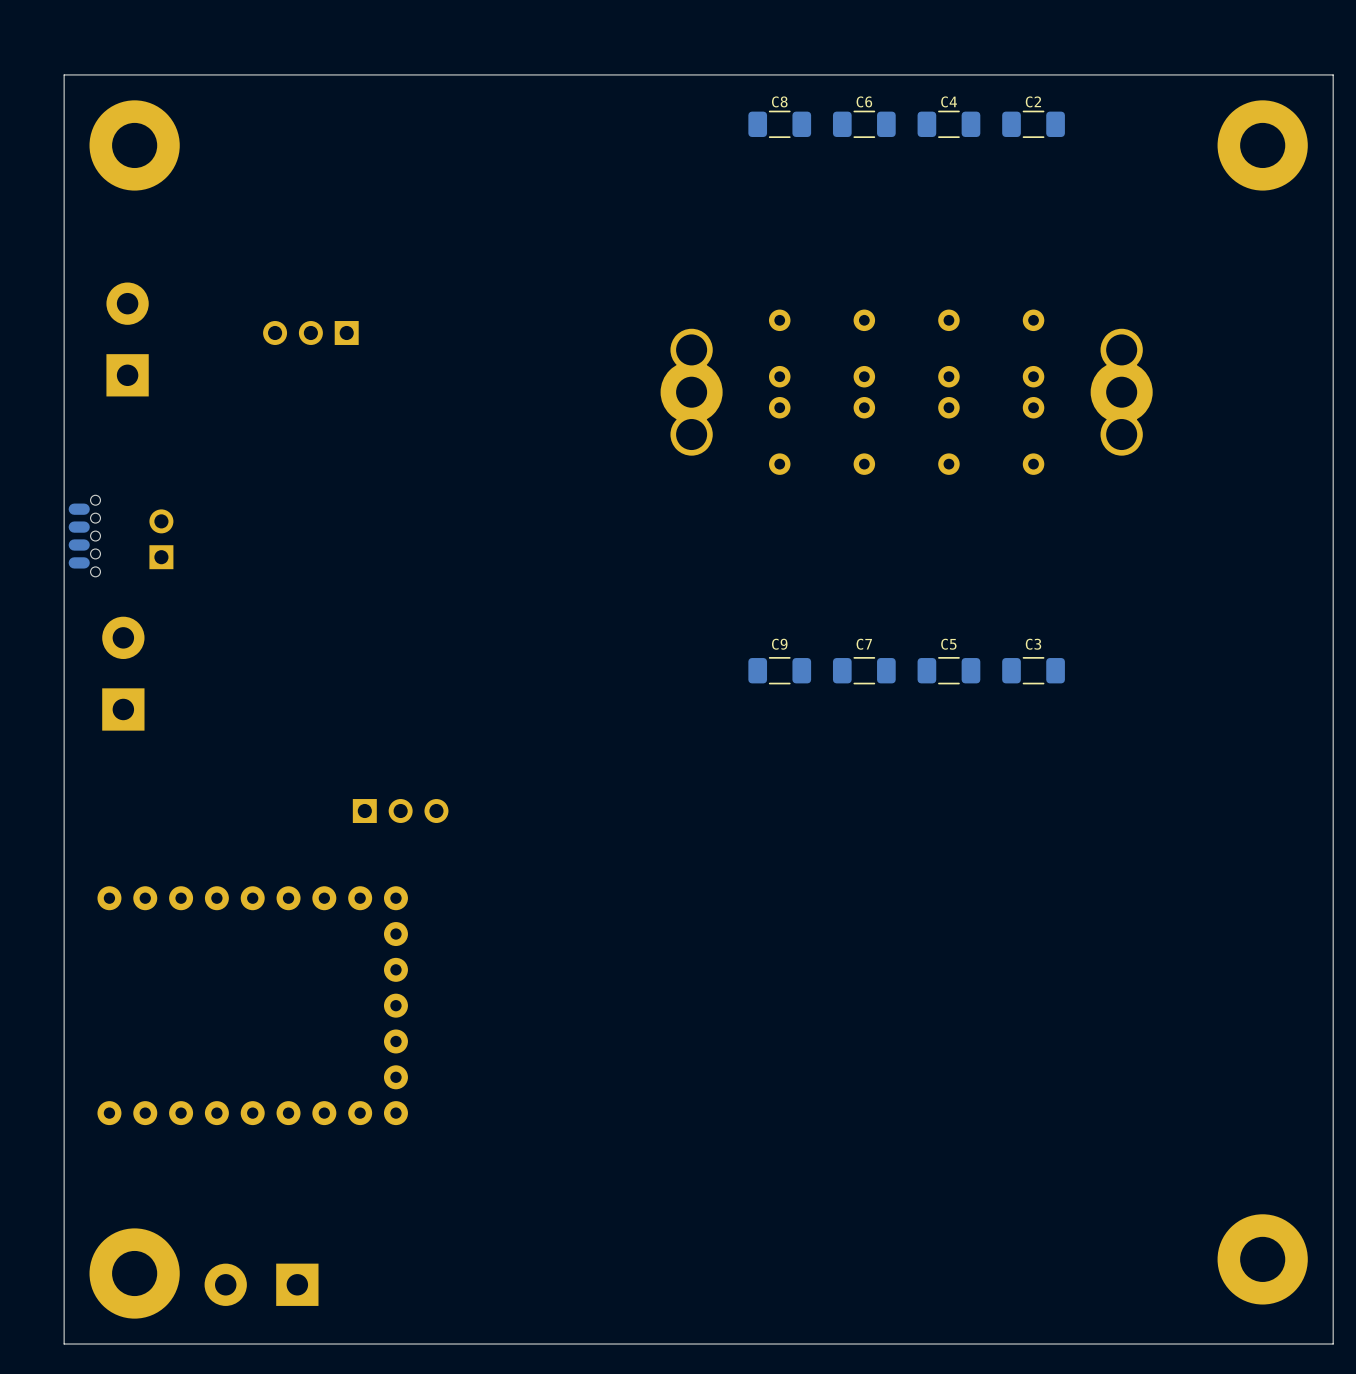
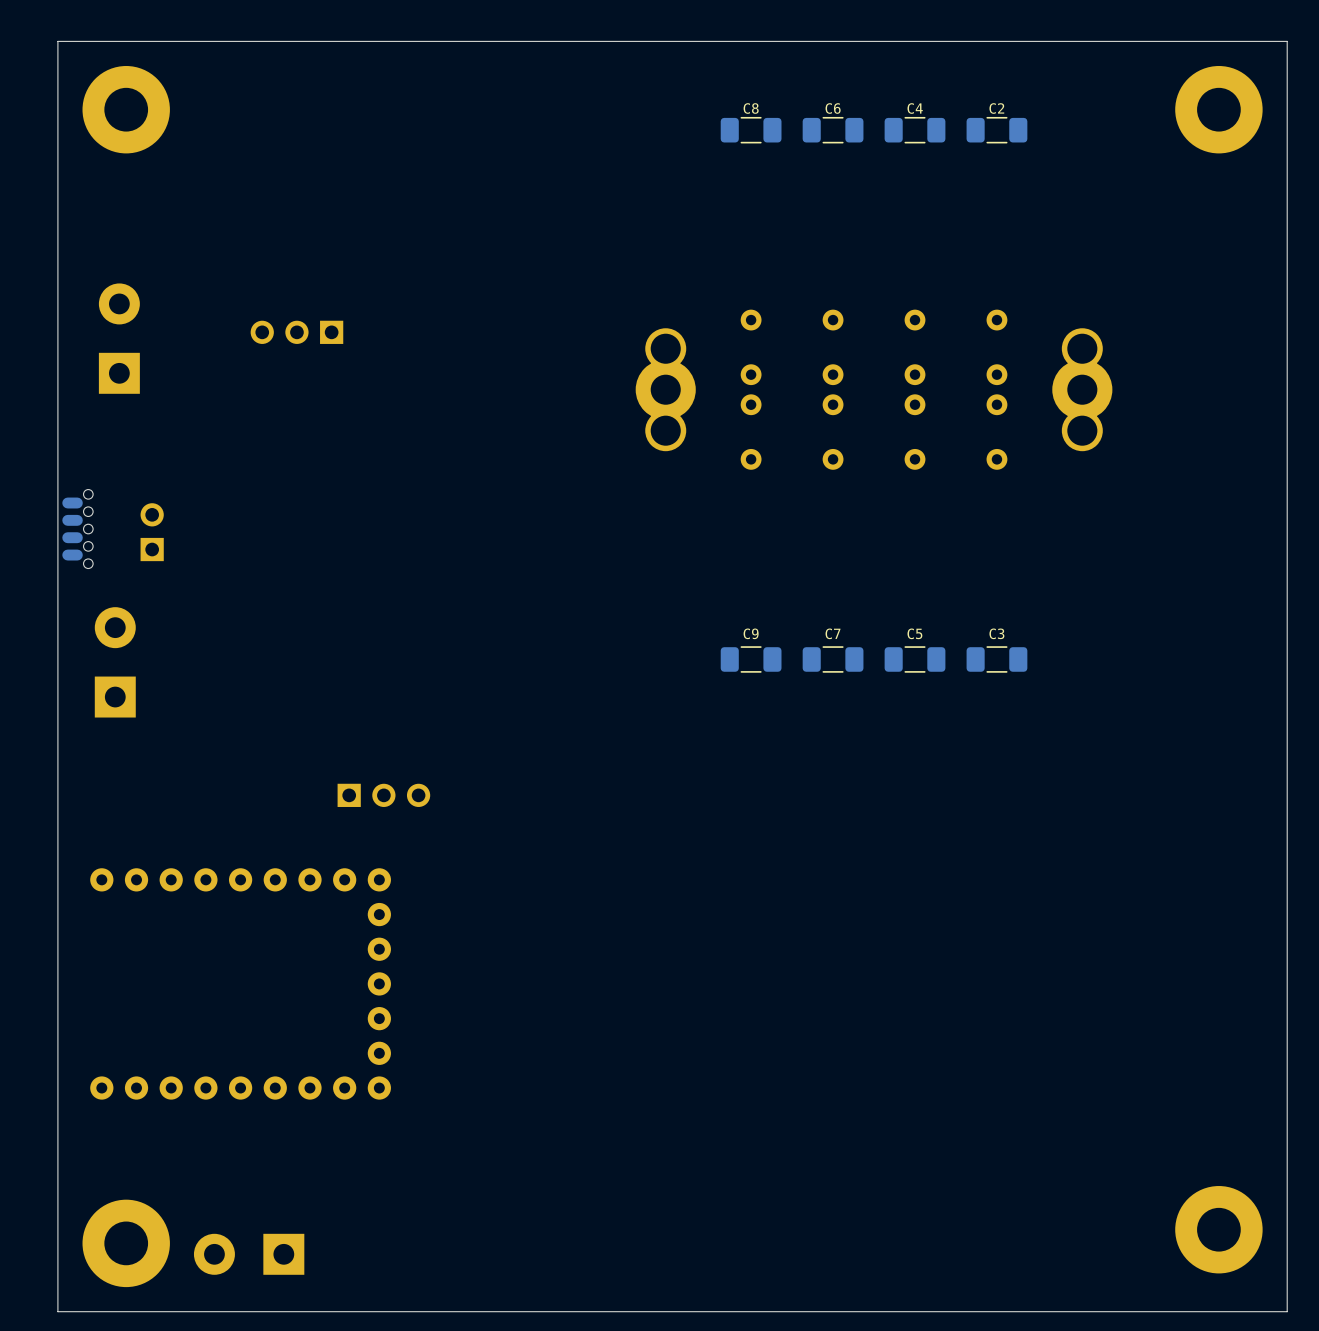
board edge: (1333, 74) (64, 74) -> (1287, 82) (1287, 41) (57, 41) (57, 82)
part position: (134, 145) -> (126, 109)
part position: (1262, 145) -> (1218, 109)

